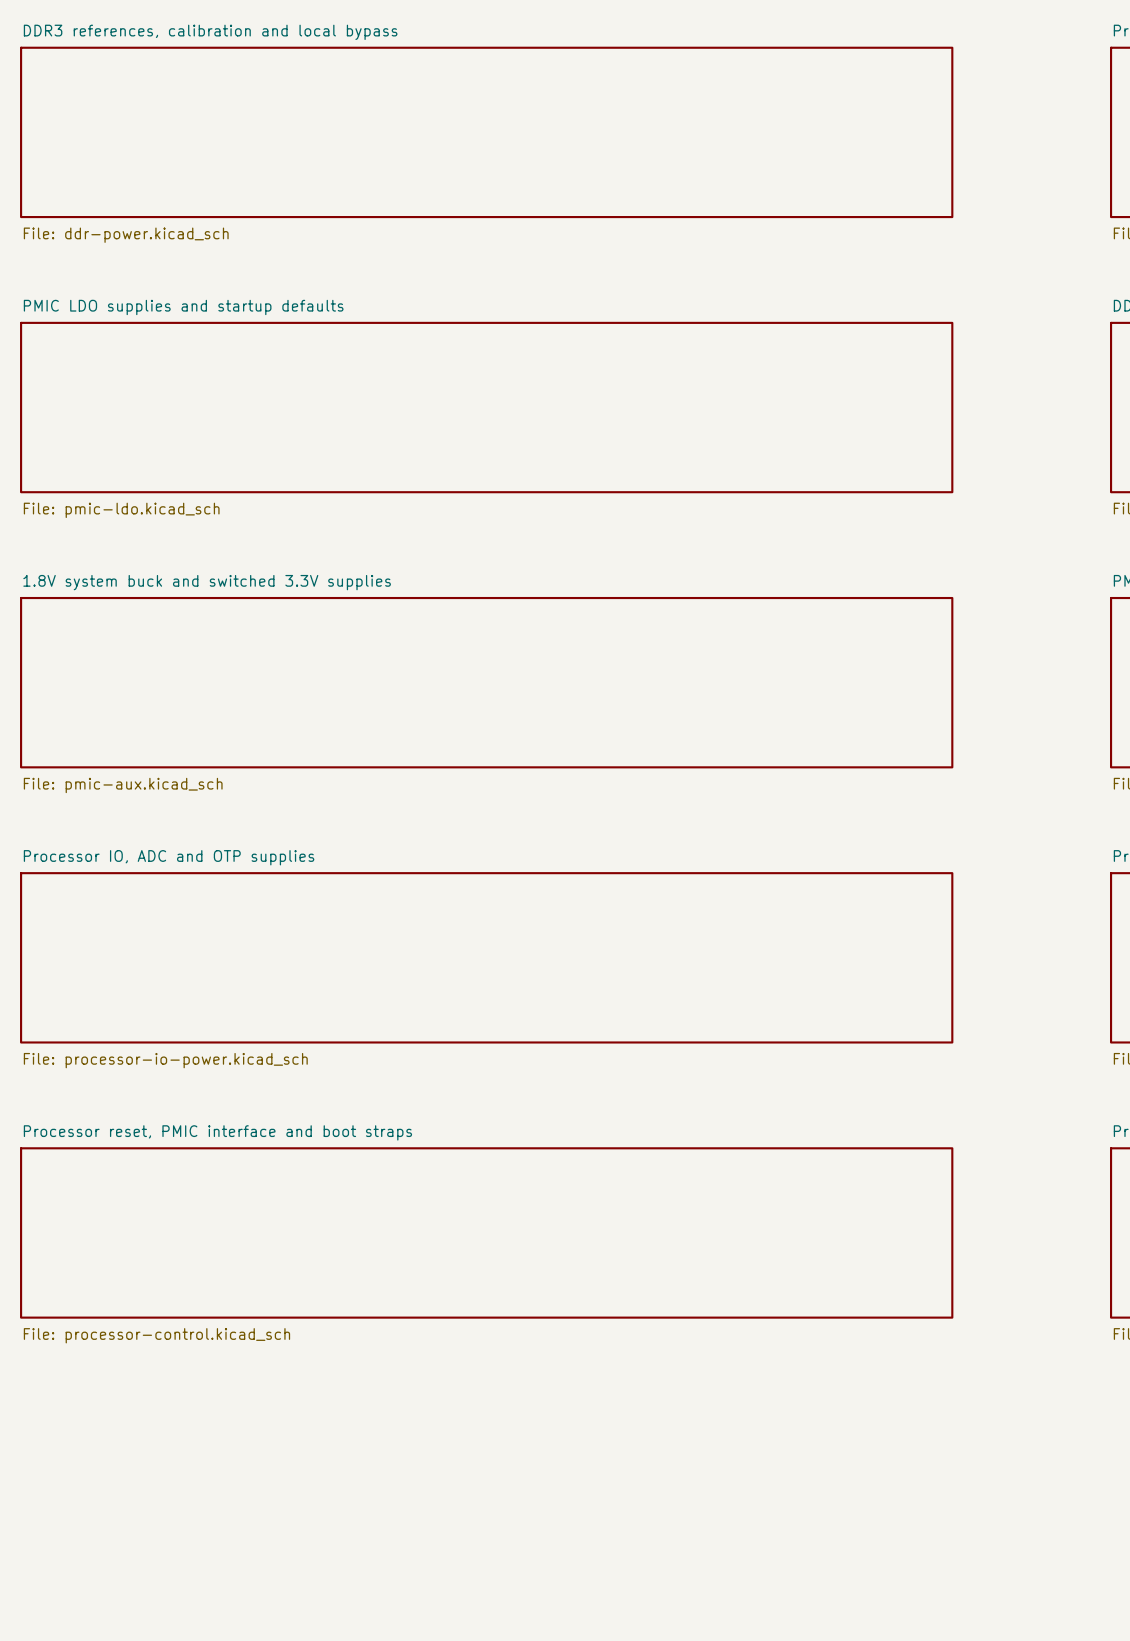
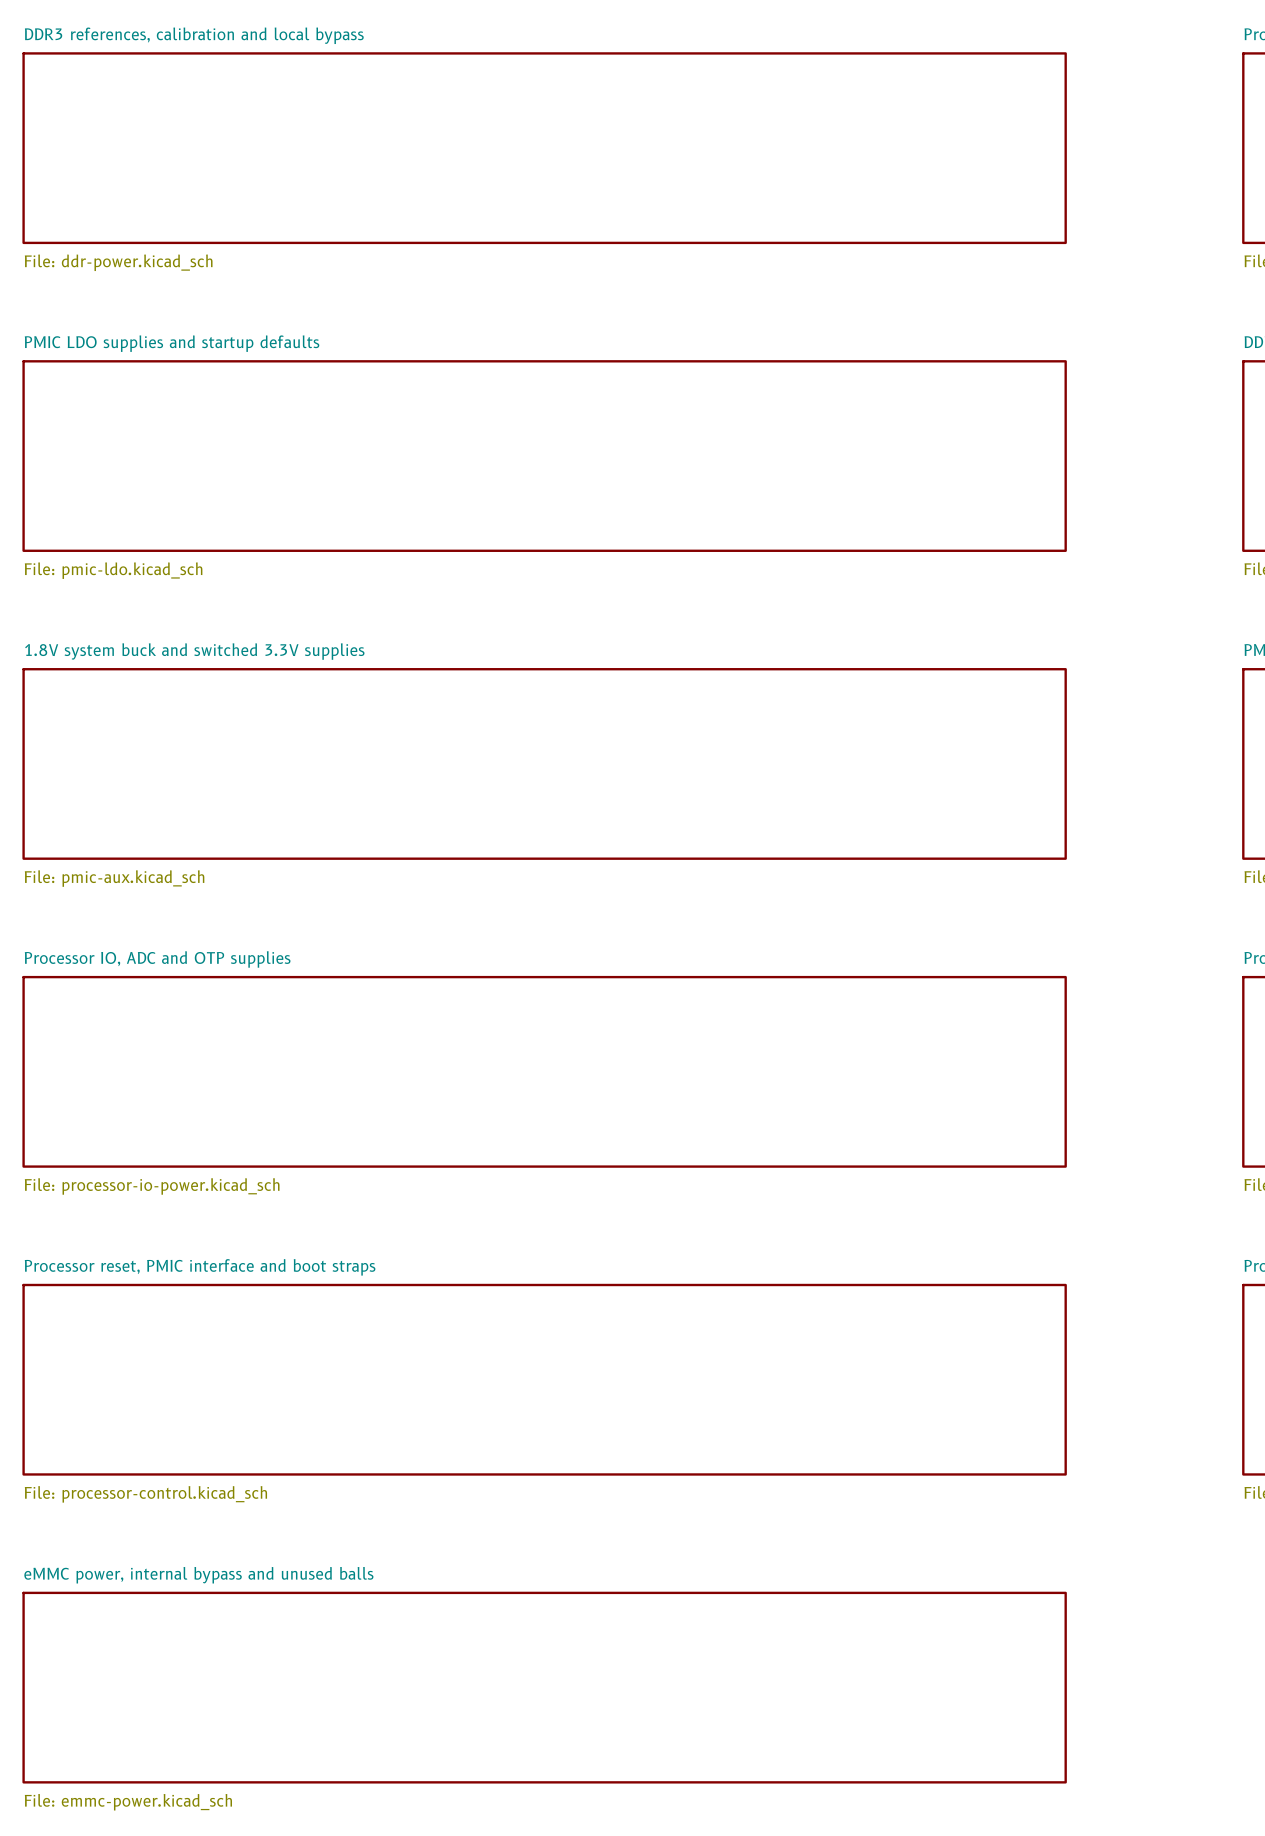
sheet eMMC power, internal bypass and unused balls: none -> File: emmc-power.kicad_sch (544, 1687)

